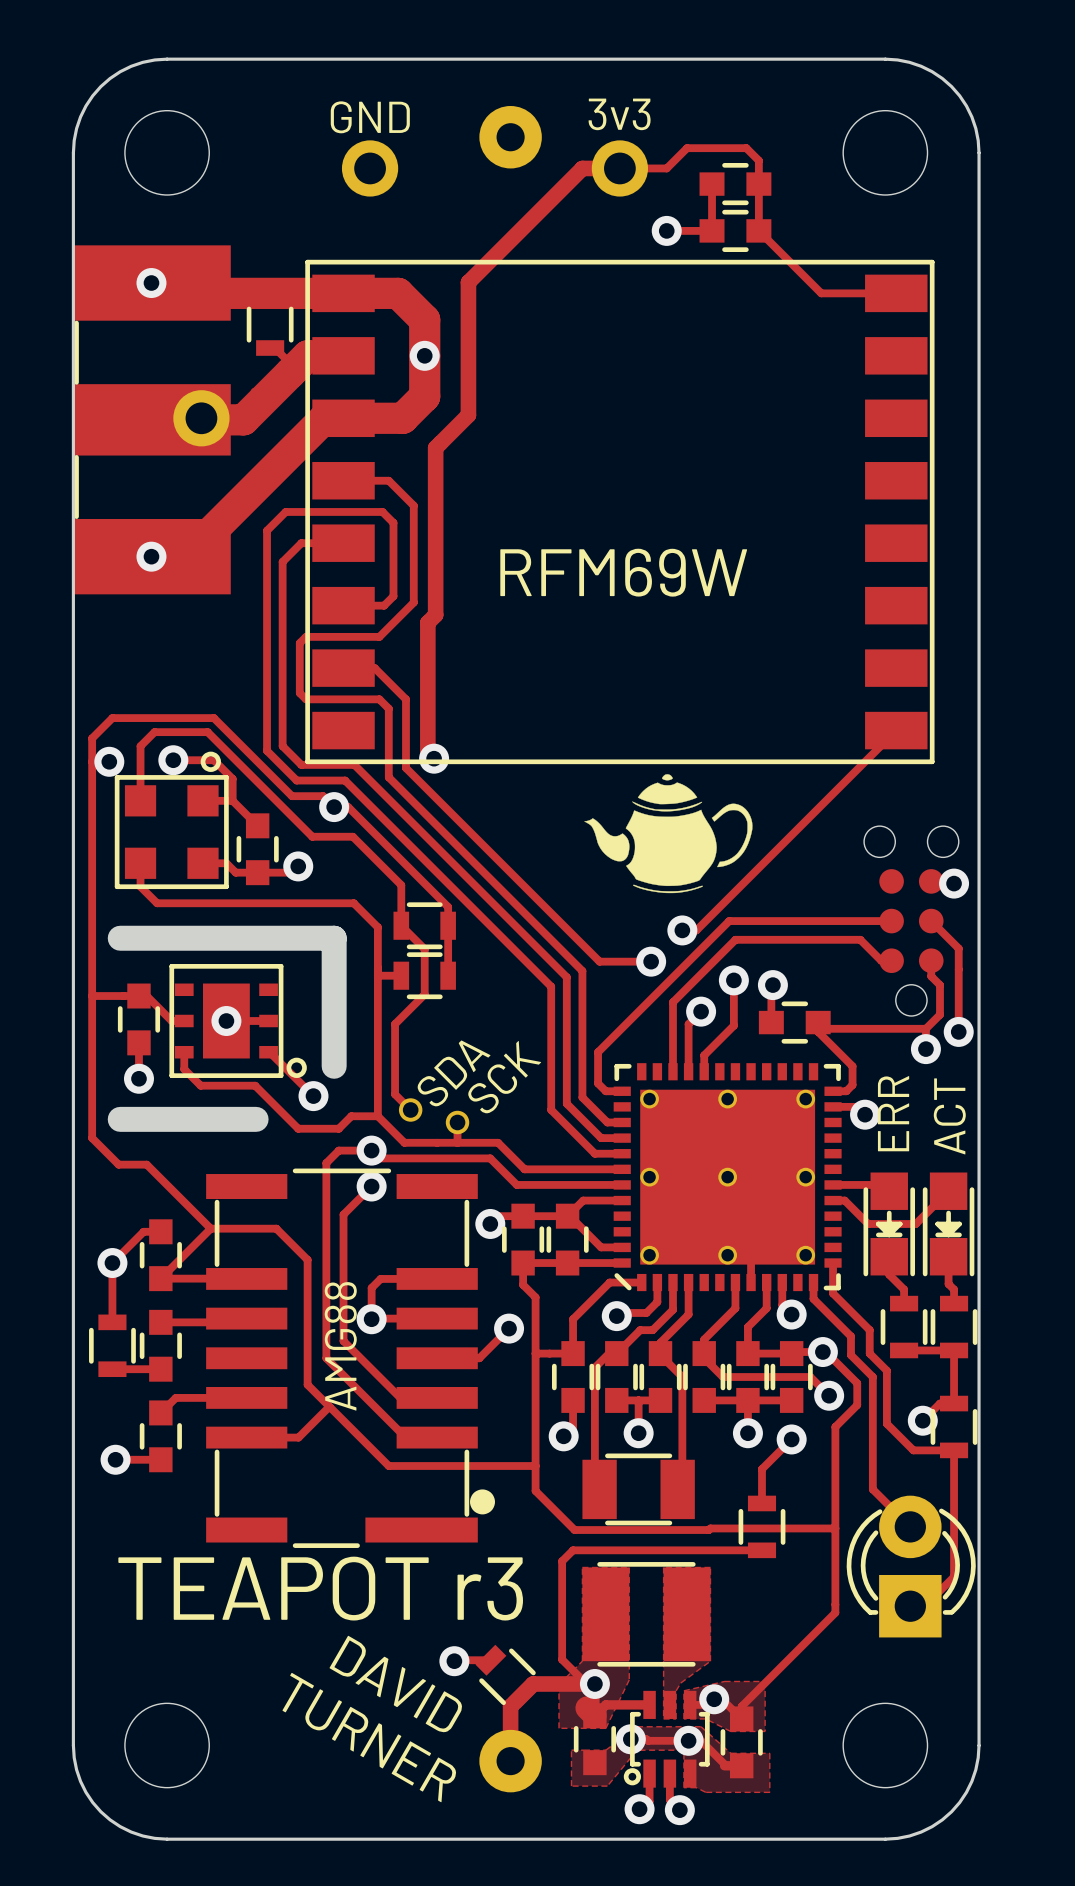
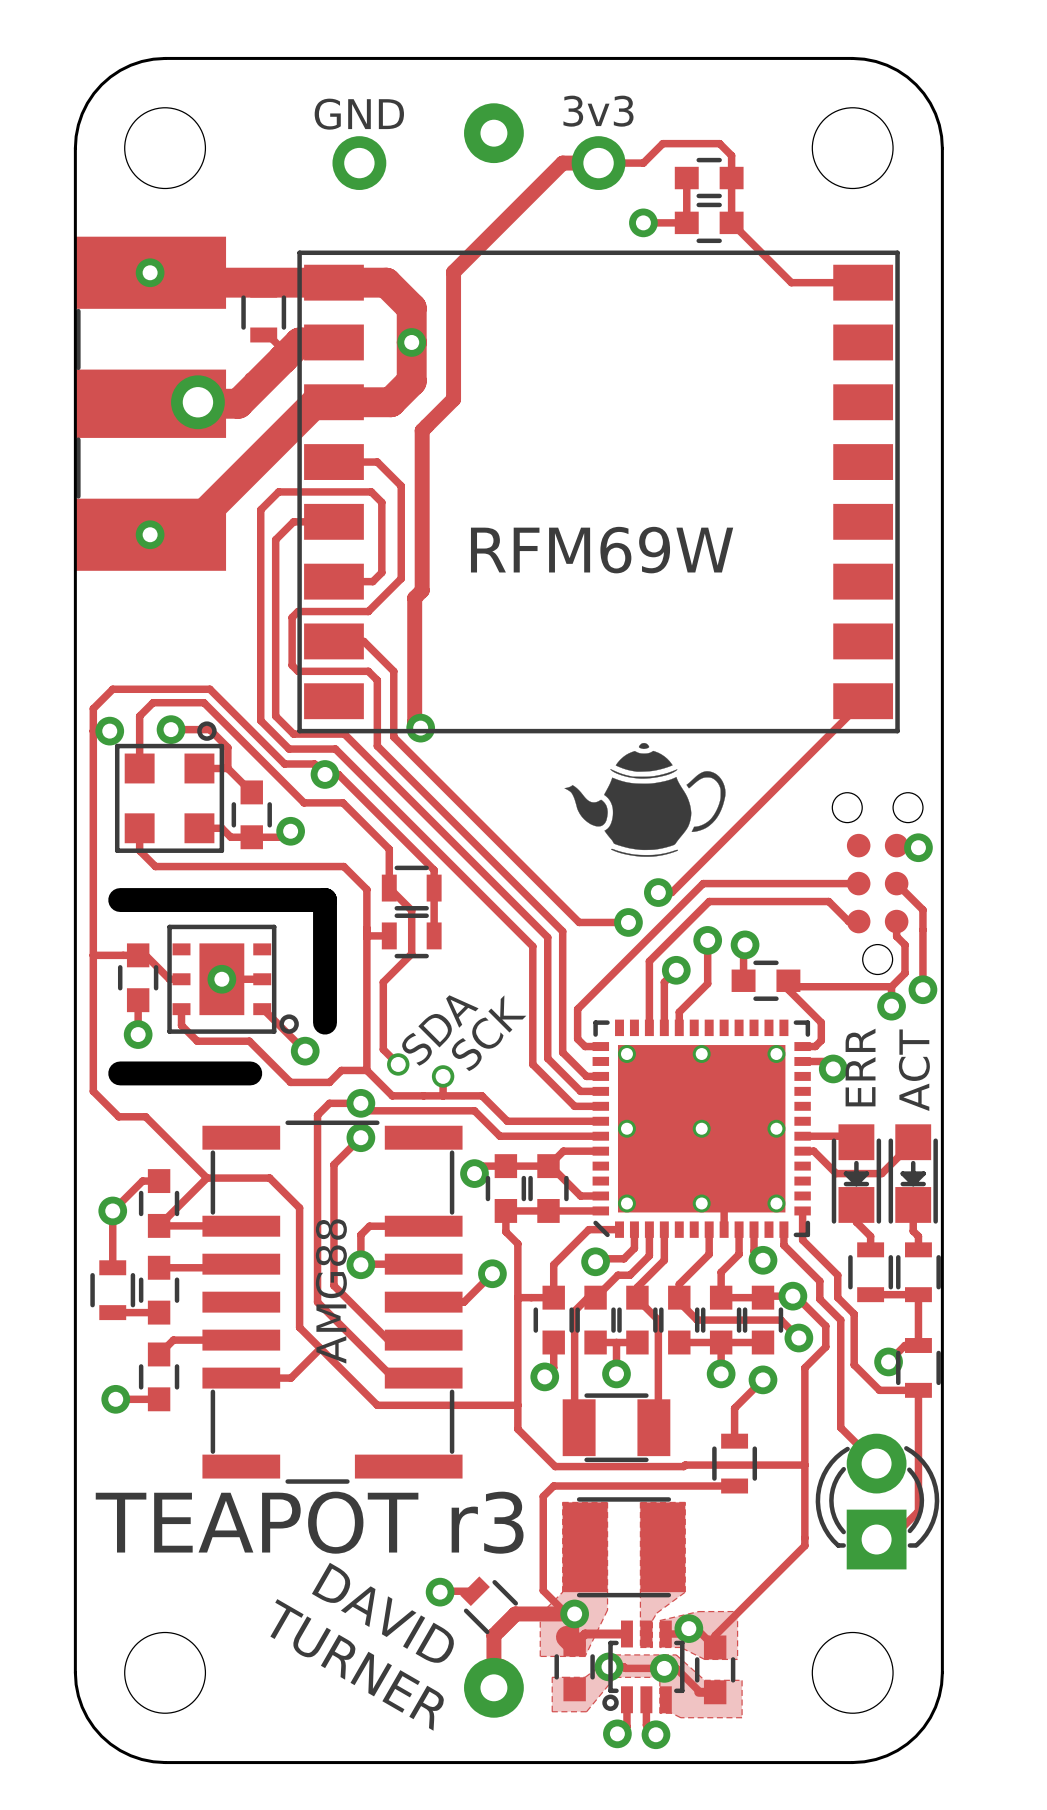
part footprint: [206, 1168, 495, 1548] -> [202, 1120, 463, 1484]

